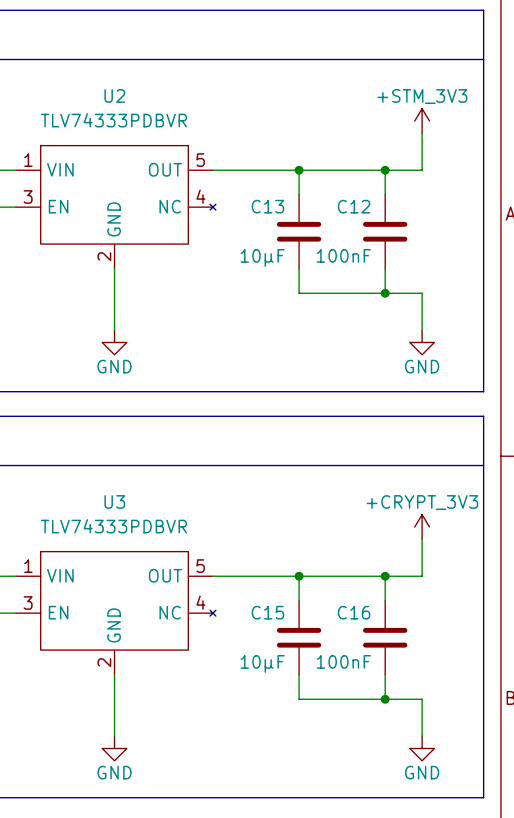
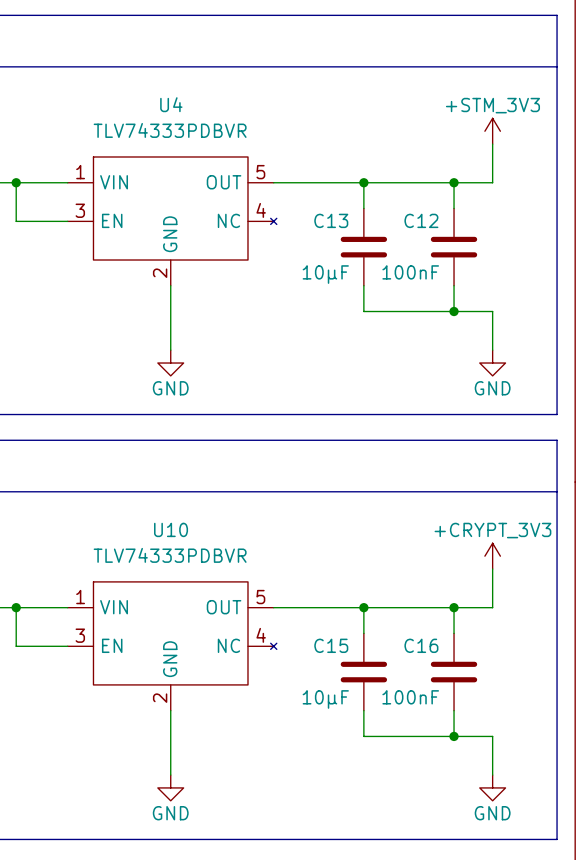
U2 name: U2 (114, 95) -> U4 (171, 104)
U3 name: U3 (114, 501) -> U10 (171, 529)

